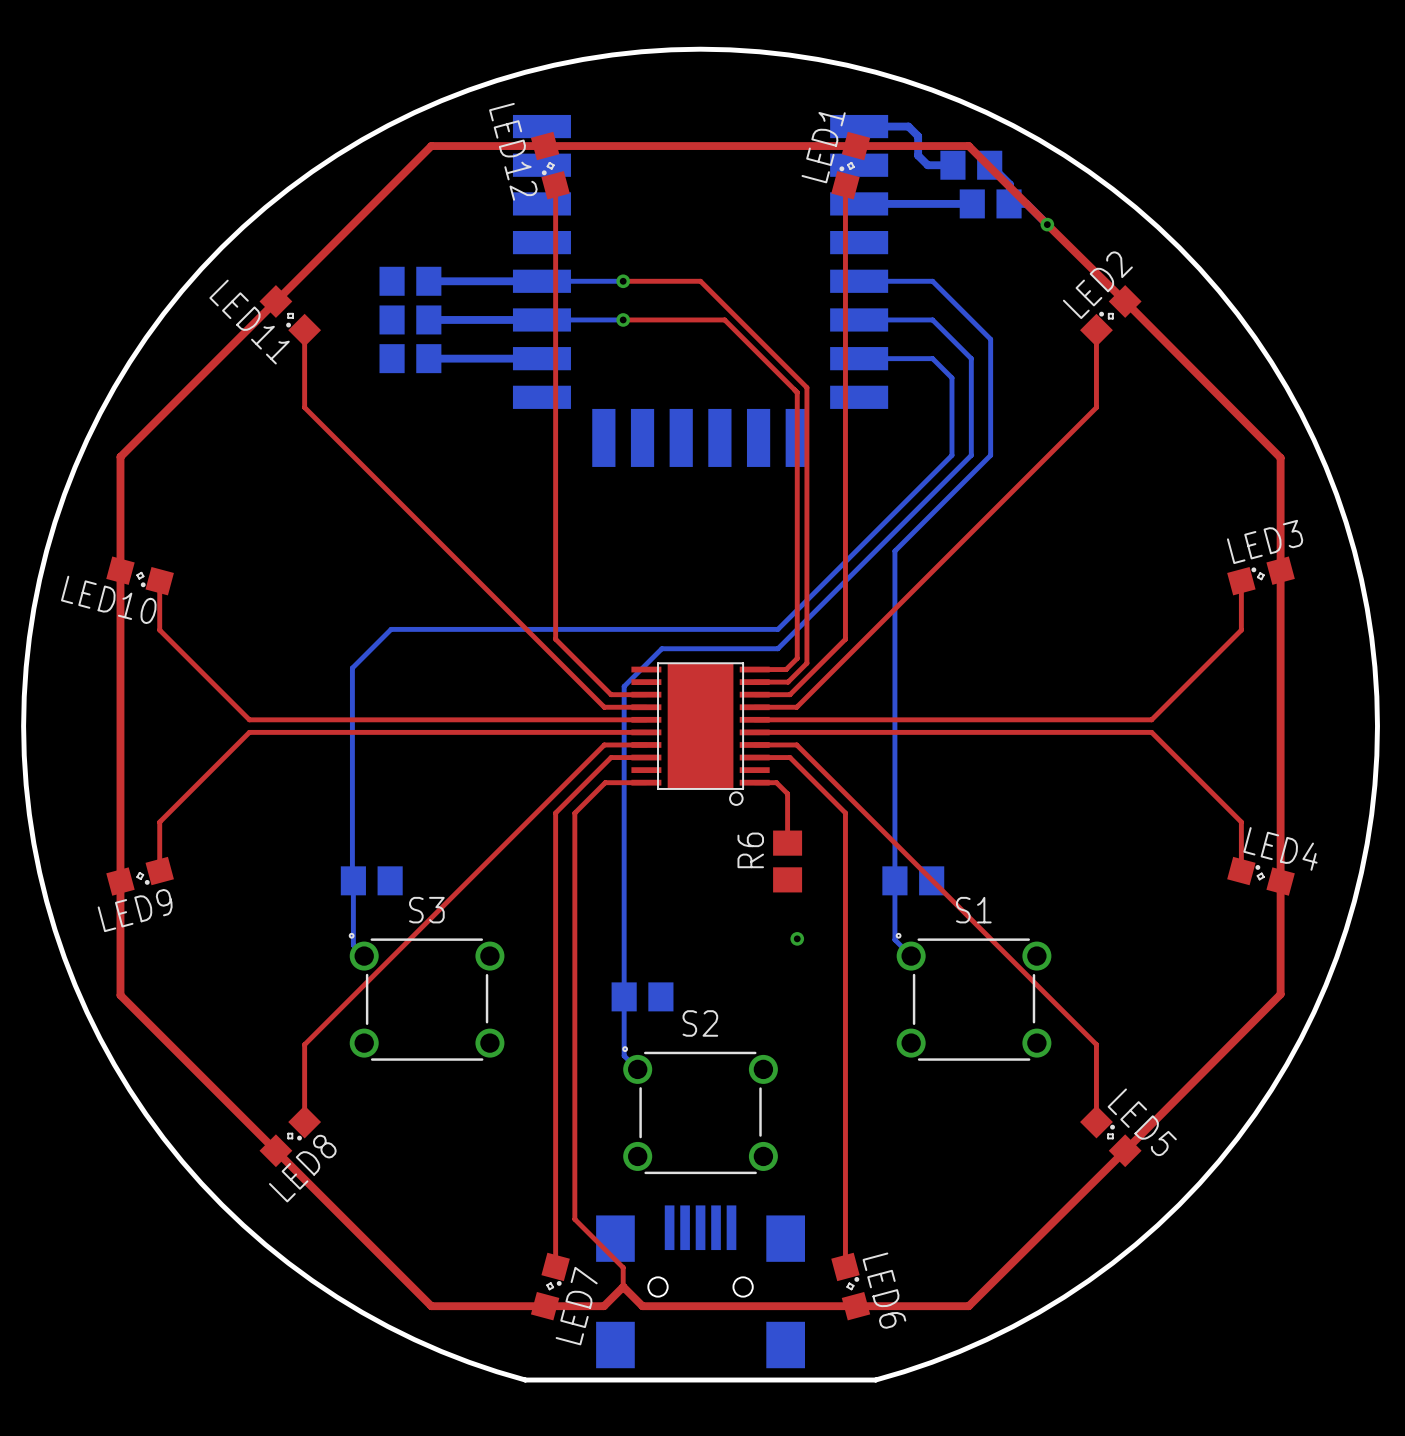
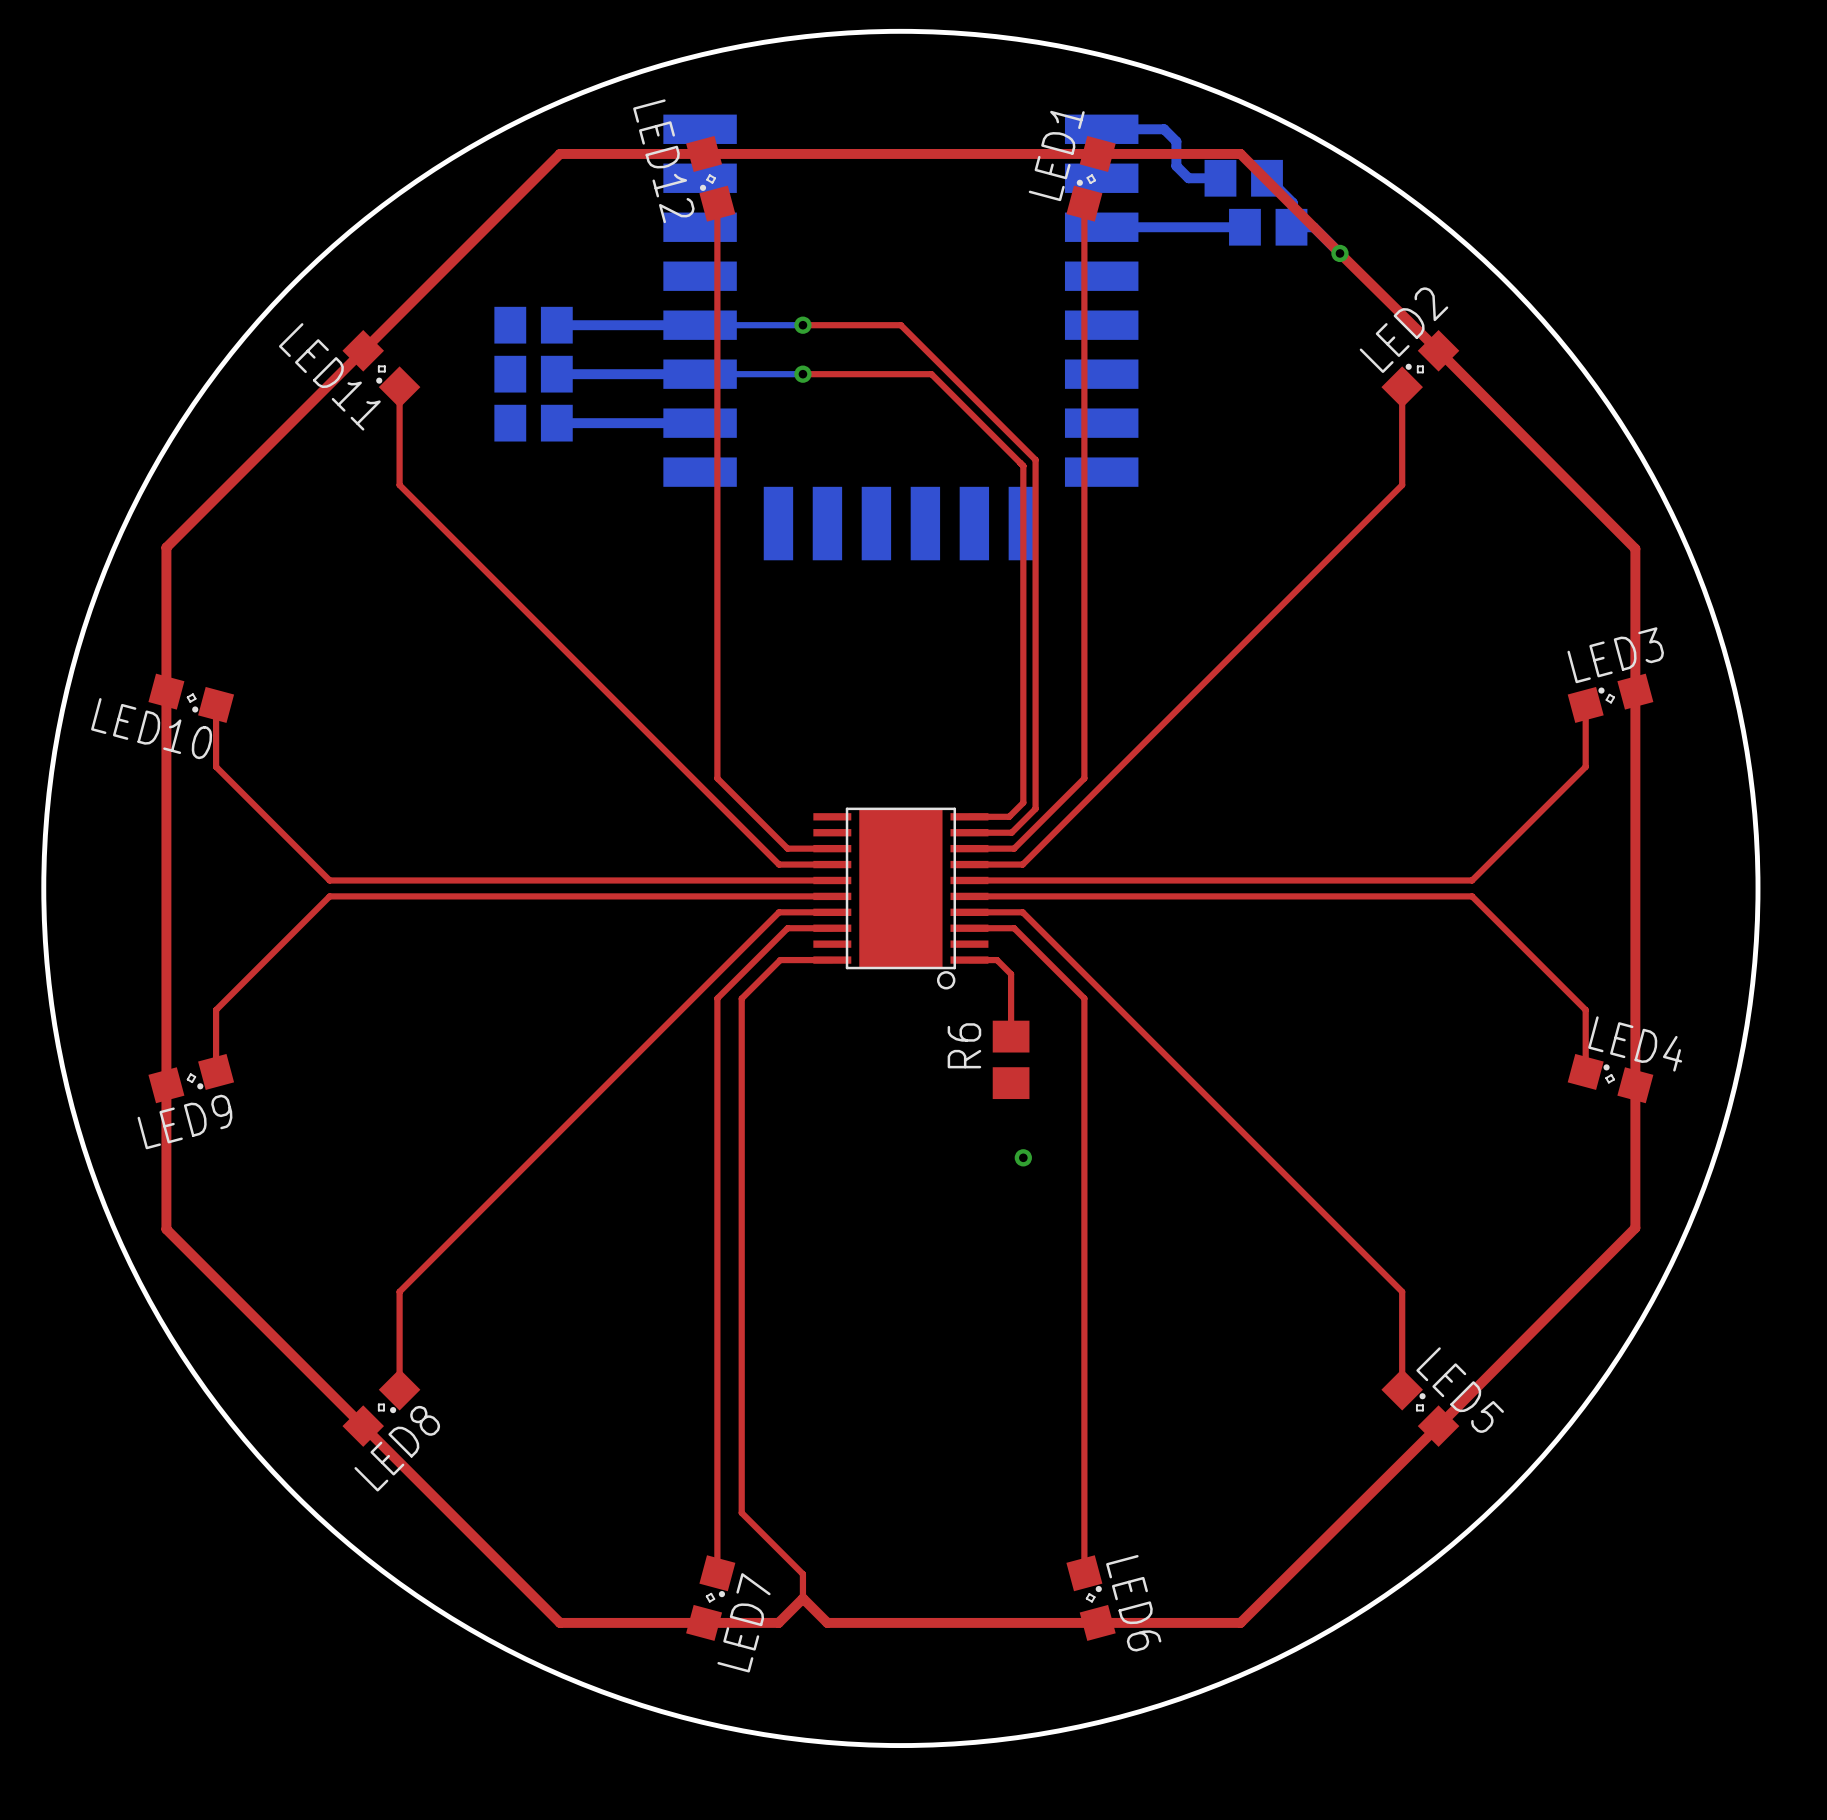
round board edge: none -> [41, 28, 1761, 1749]
bottom track: (859, 281) (932, 281) (990, 339) (990, 455) (894, 551) (894, 939) (911, 956) -> none
bottom track: (859, 319) (932, 319) (971, 358) (971, 455) (777, 648) (661, 648) (624, 686) (624, 1055) (637, 1069) -> none
bottom track: (859, 358) (932, 358) (951, 377) (951, 455) (777, 629) (391, 629) (352, 668) (353, 945) (364, 956) -> none
part: (371, 880) -> none
part: (913, 880) -> none
S3: (426, 996) -> none
part: (642, 996) -> none
S1: (973, 996) -> none
S2: (700, 1110) -> none
part: (700, 1286) -> none
board edge: (525, 1380) (875, 1380) (959, 1351) (1039, 1312) (1088, 1280) (1135, 1244) (1199, 1183) (1237, 1138) (1271, 1089) (1301, 1038) (1336, 957) (1354, 901) (1367, 843) (1376, 755) (1376, 696) (1371, 637) (1361, 579) (1336, 494) (1314, 440) (1286, 387) (1255, 337) (1199, 268) (1157, 227) (1112, 189) (1064, 155) (1013, 125) (932, 90) (875, 72) (788, 54) (730, 49) (671, 49) (612, 54) (554, 65) (496, 80) (414, 112) (362, 139) (312, 171) (265, 207) (201, 268) (163, 314) (129, 362) (100, 413) (64, 494) (46, 550) (33, 608) (24, 696) (24, 755) (29, 814) (39, 872) (64, 957) (87, 1012) (114, 1064) (146, 1114) (201, 1183) (243, 1225) (288, 1263) (336, 1297) (387, 1326) (469, 1362) (525, 1380) -> none

